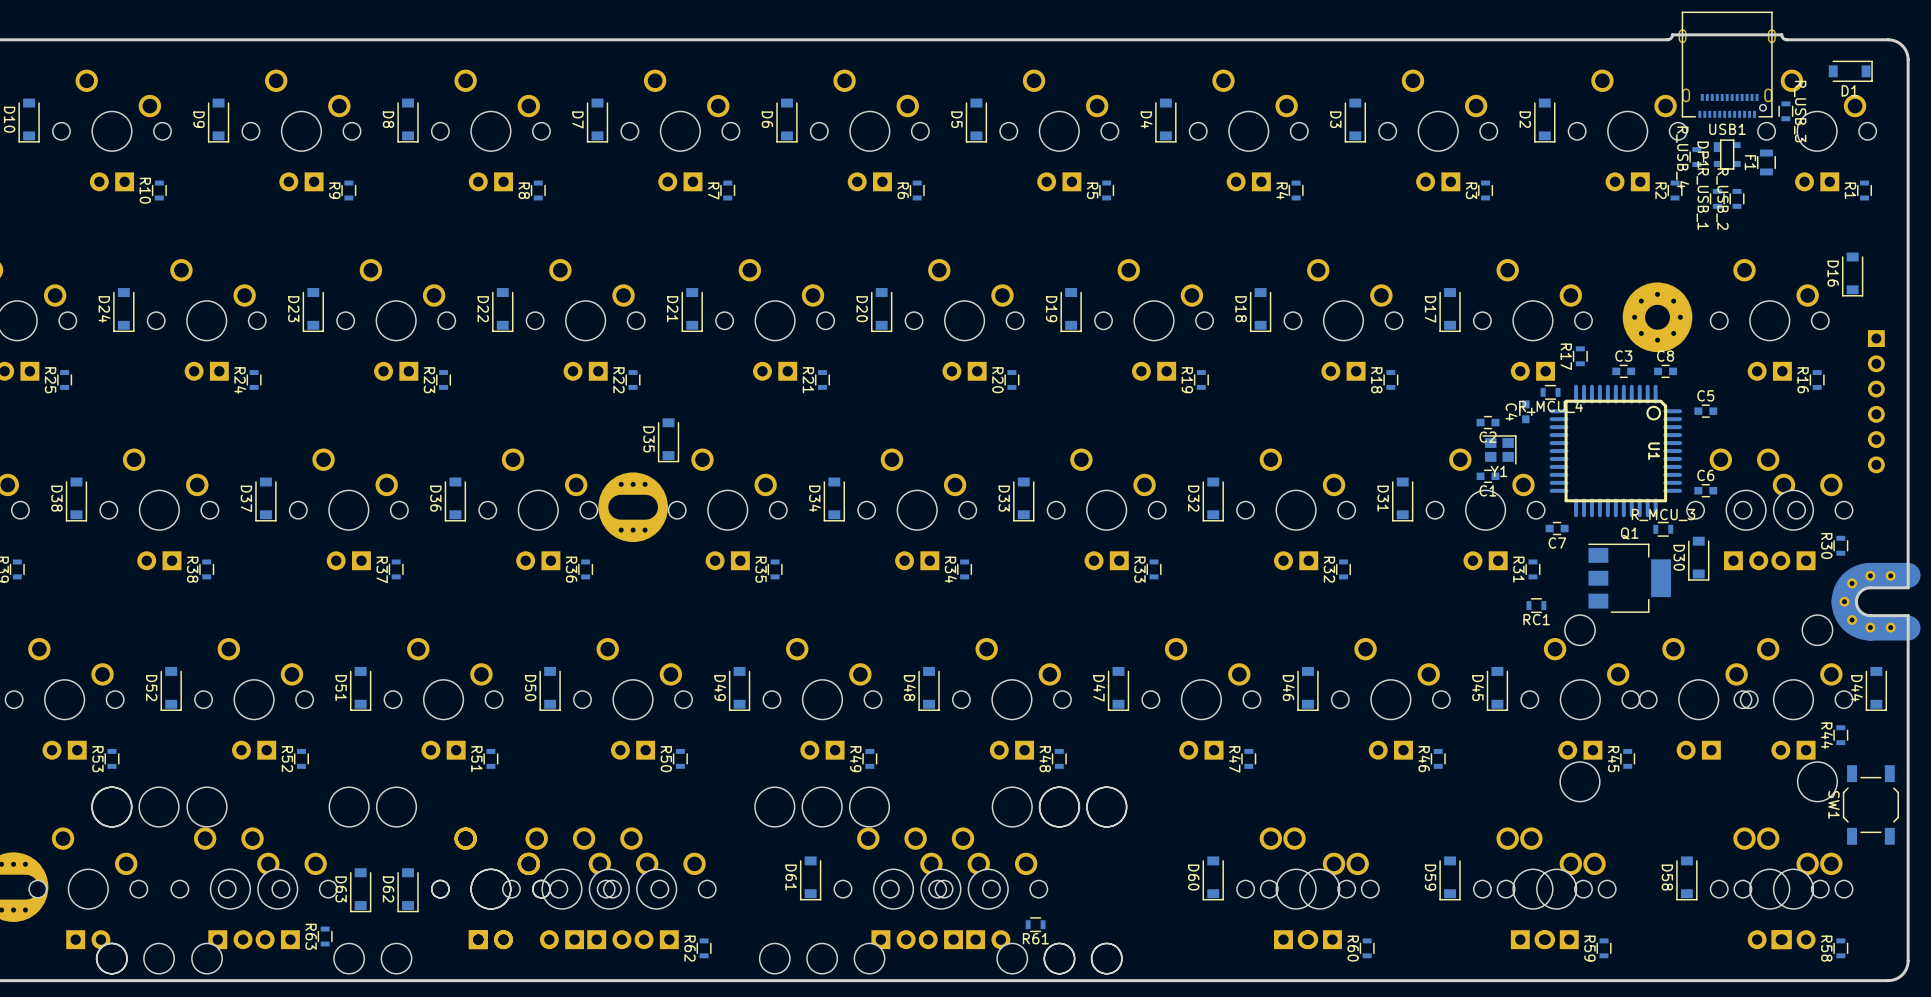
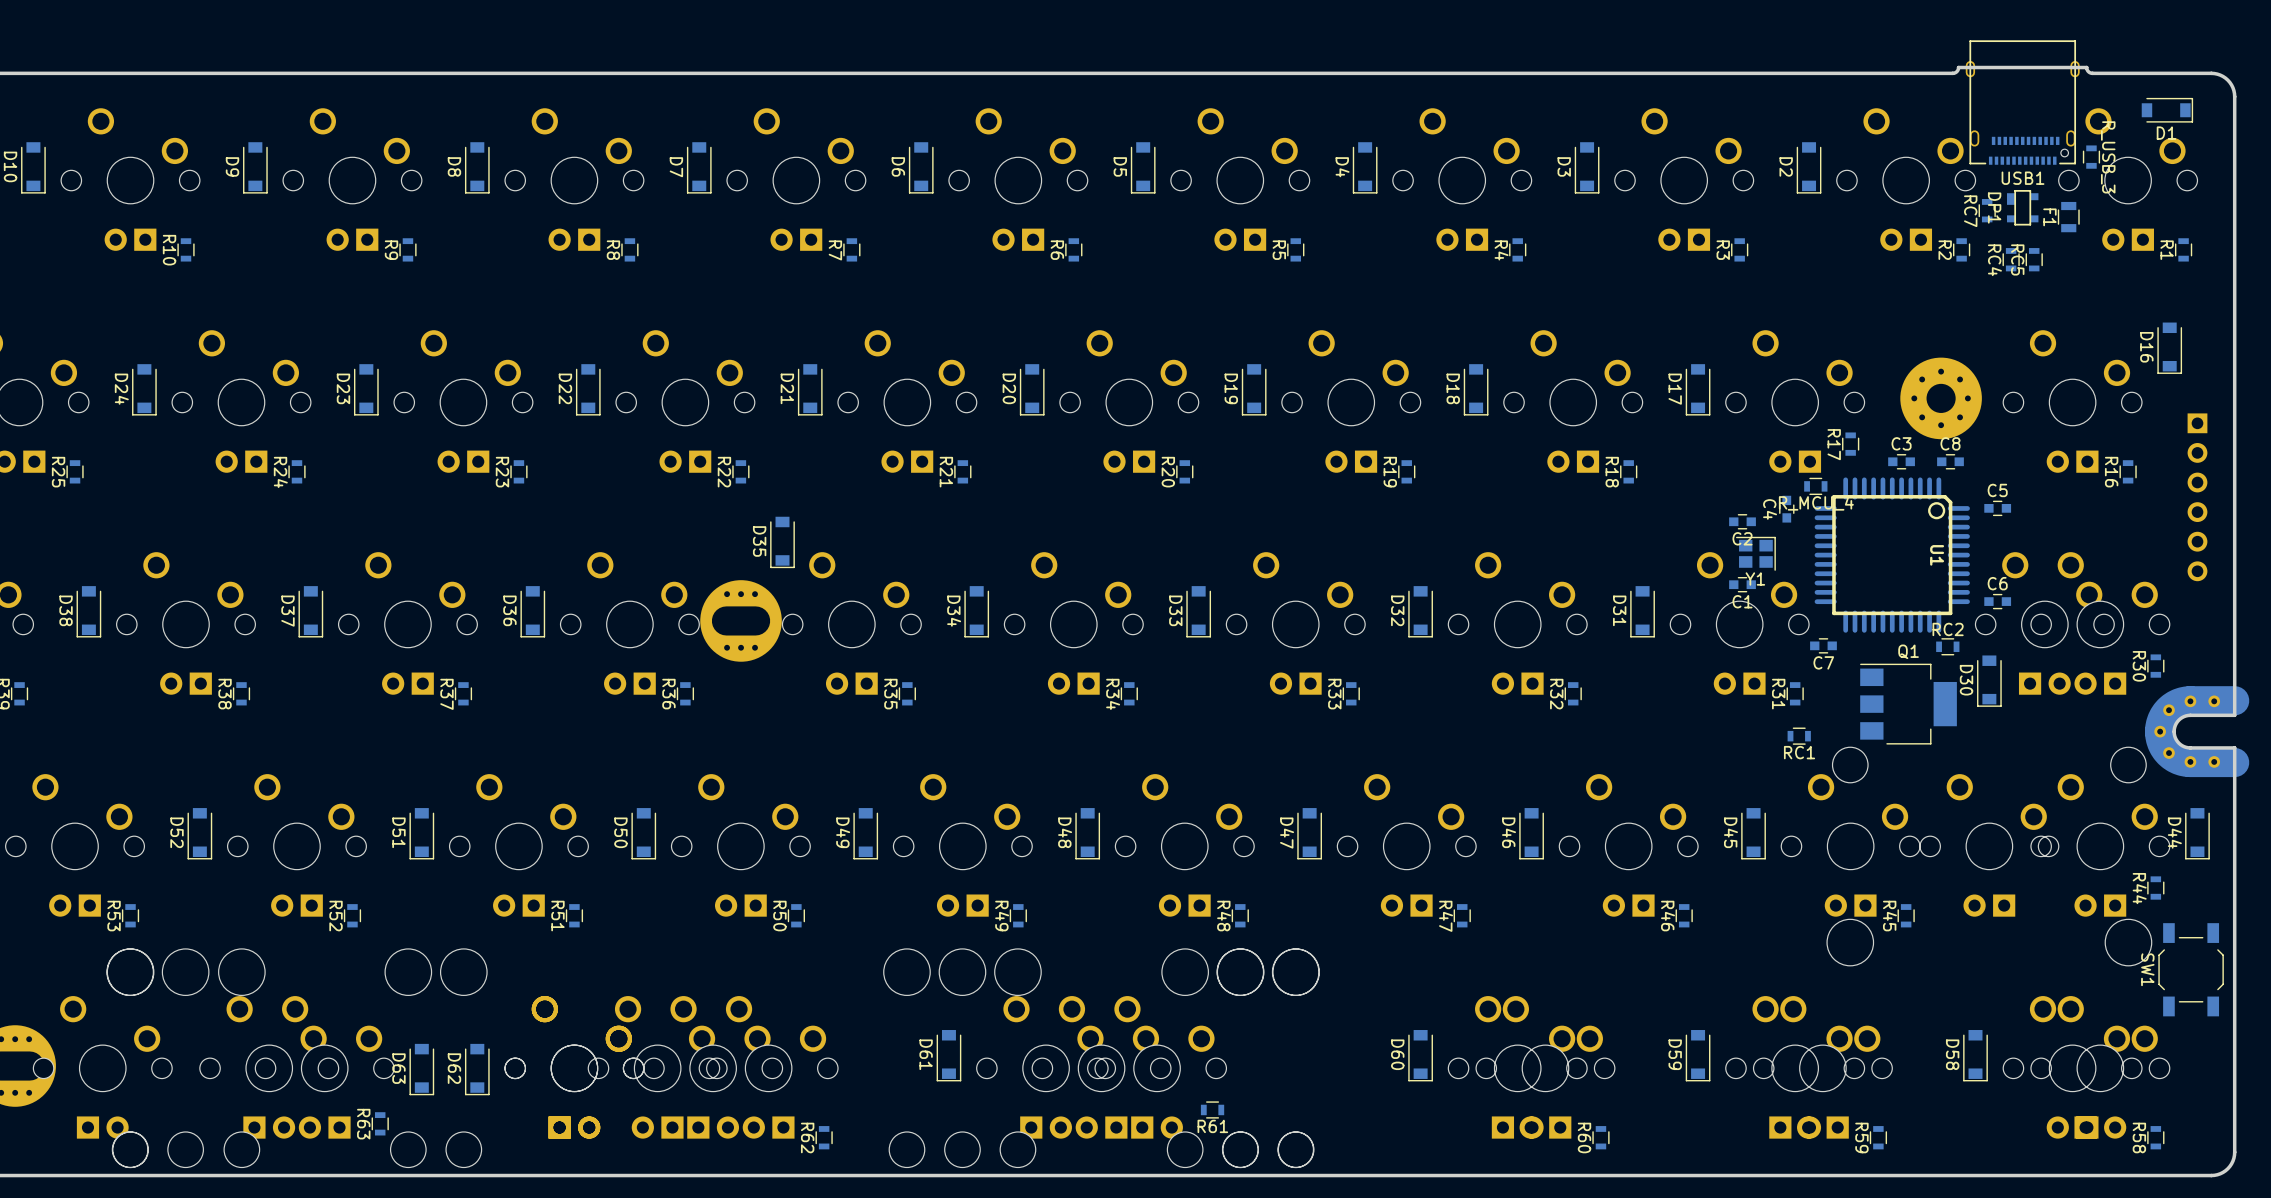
R_USB_4 name: R_USB_4 (1682, 157) -> RC7 (1970, 211)
R_USB_1 name: R_USB_1 (1702, 199) -> RC4 (1994, 260)
R_USB_2 name: R_USB_2 (1722, 199) -> RC5 (2017, 259)
R_MCU_3 name: R_MCU_3 (1663, 514) -> RC2 (1948, 629)

